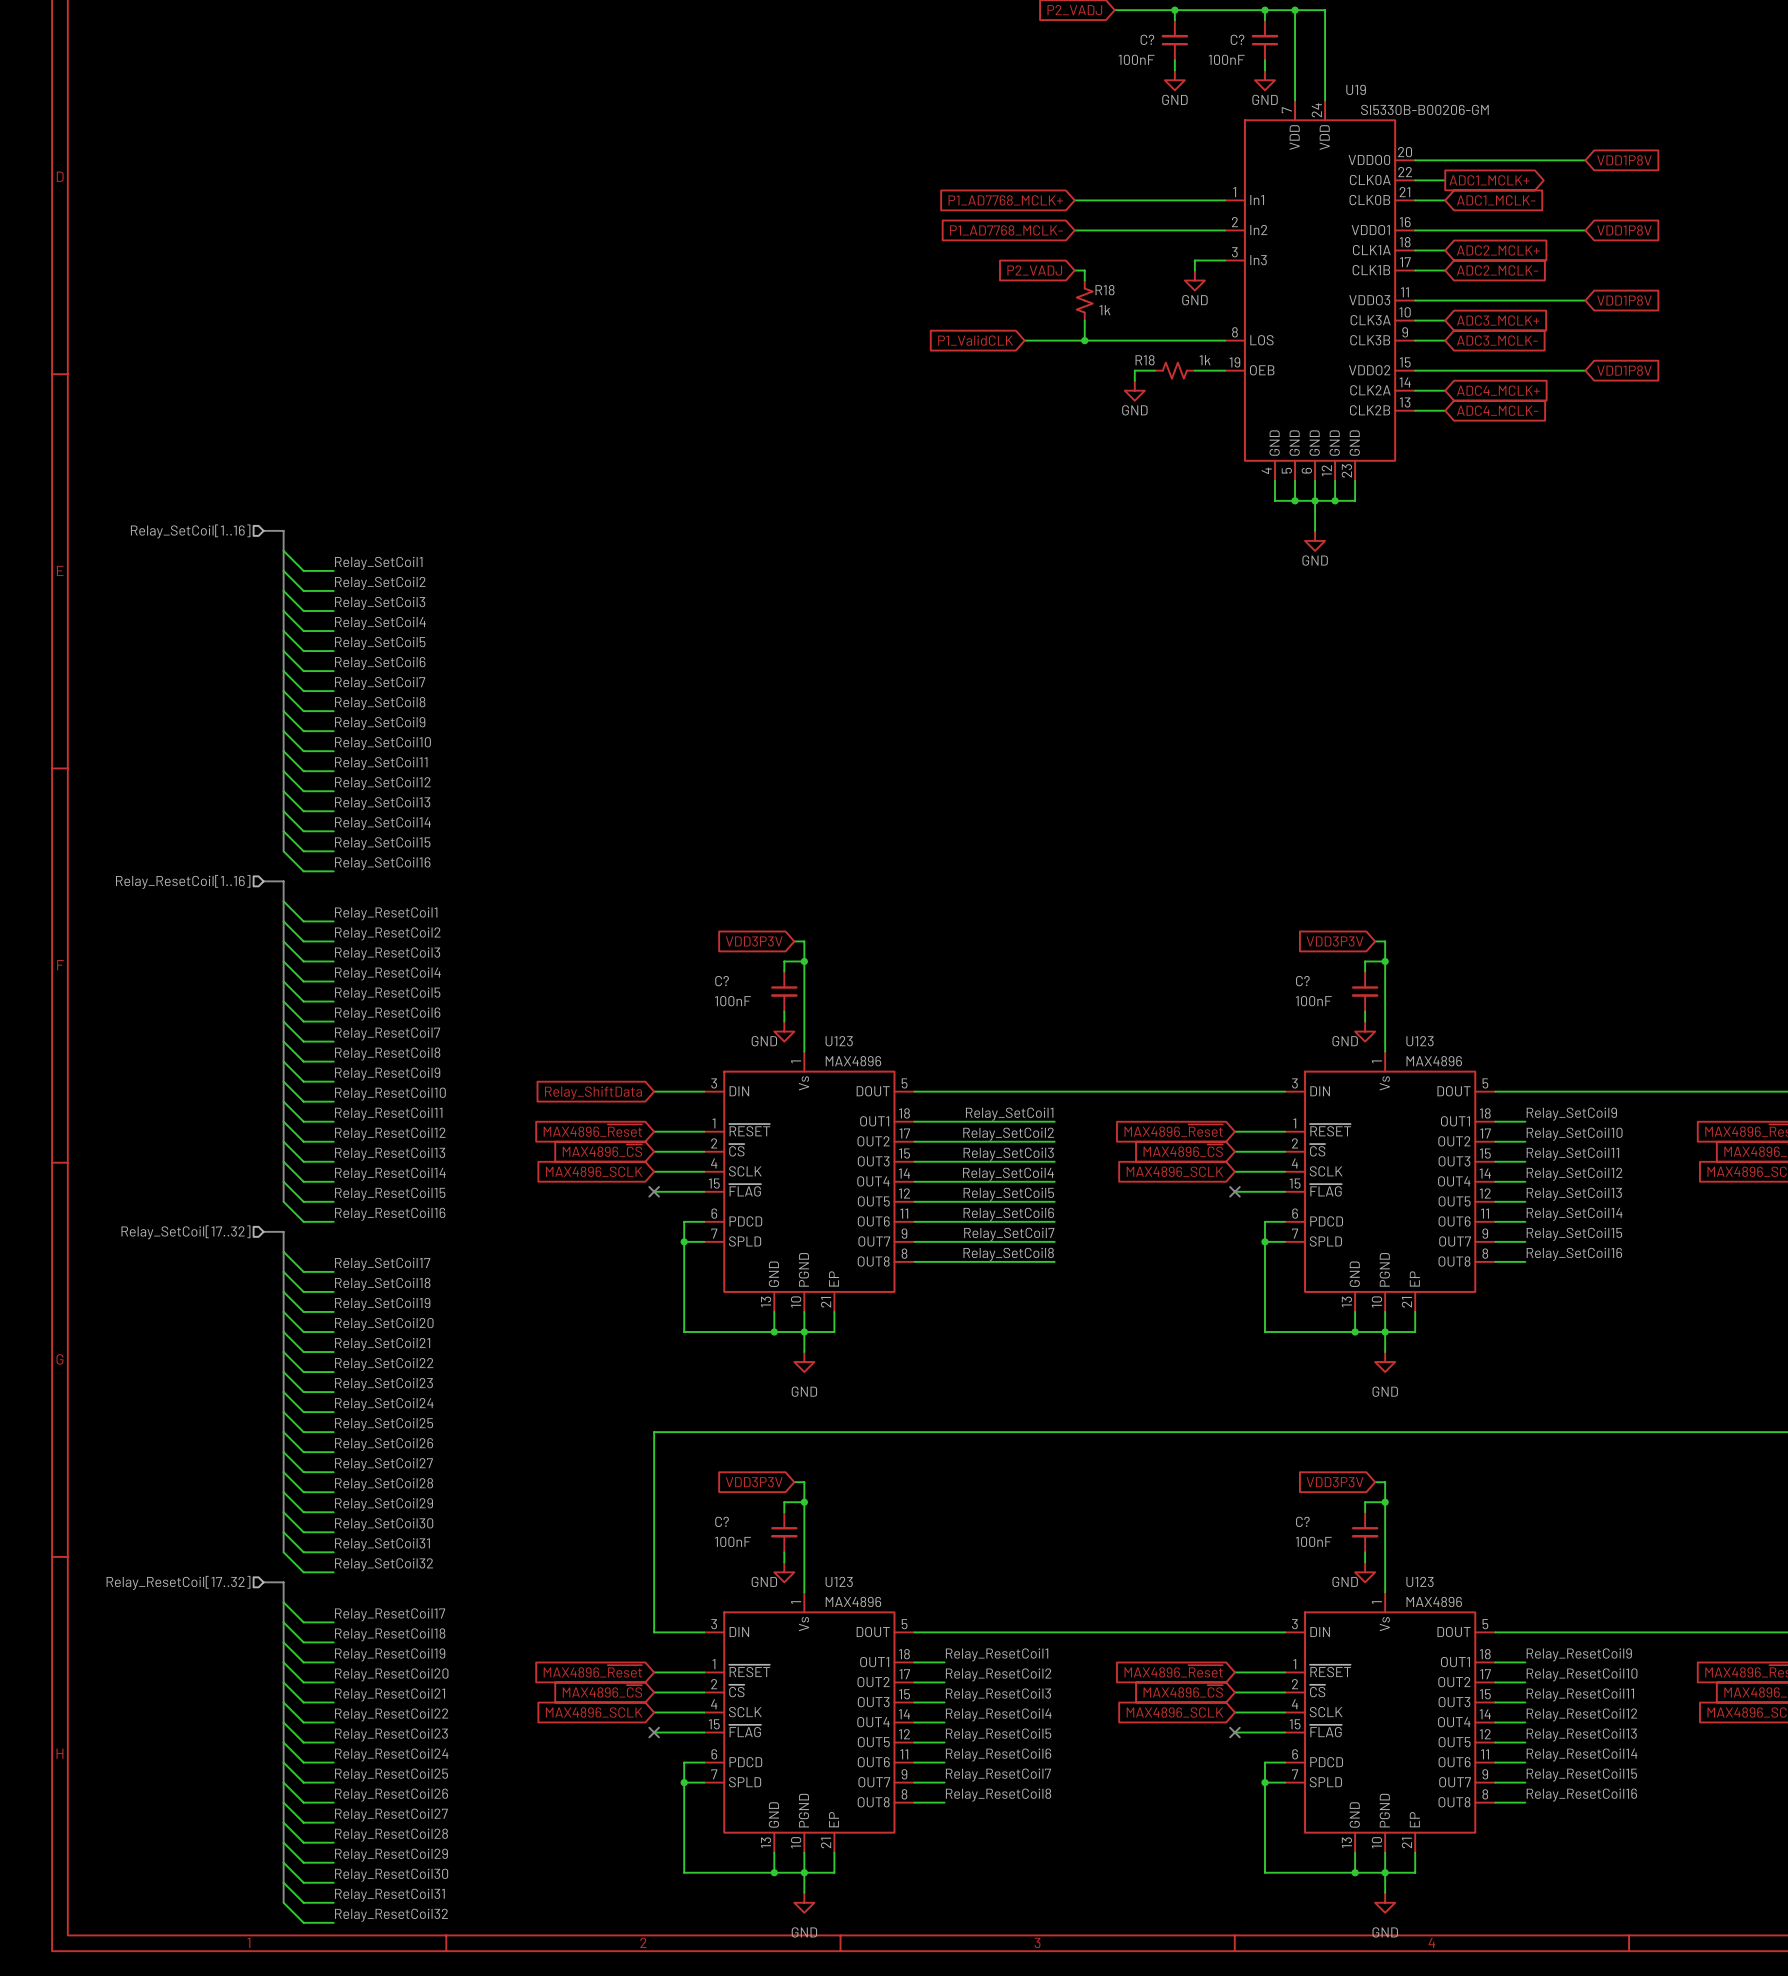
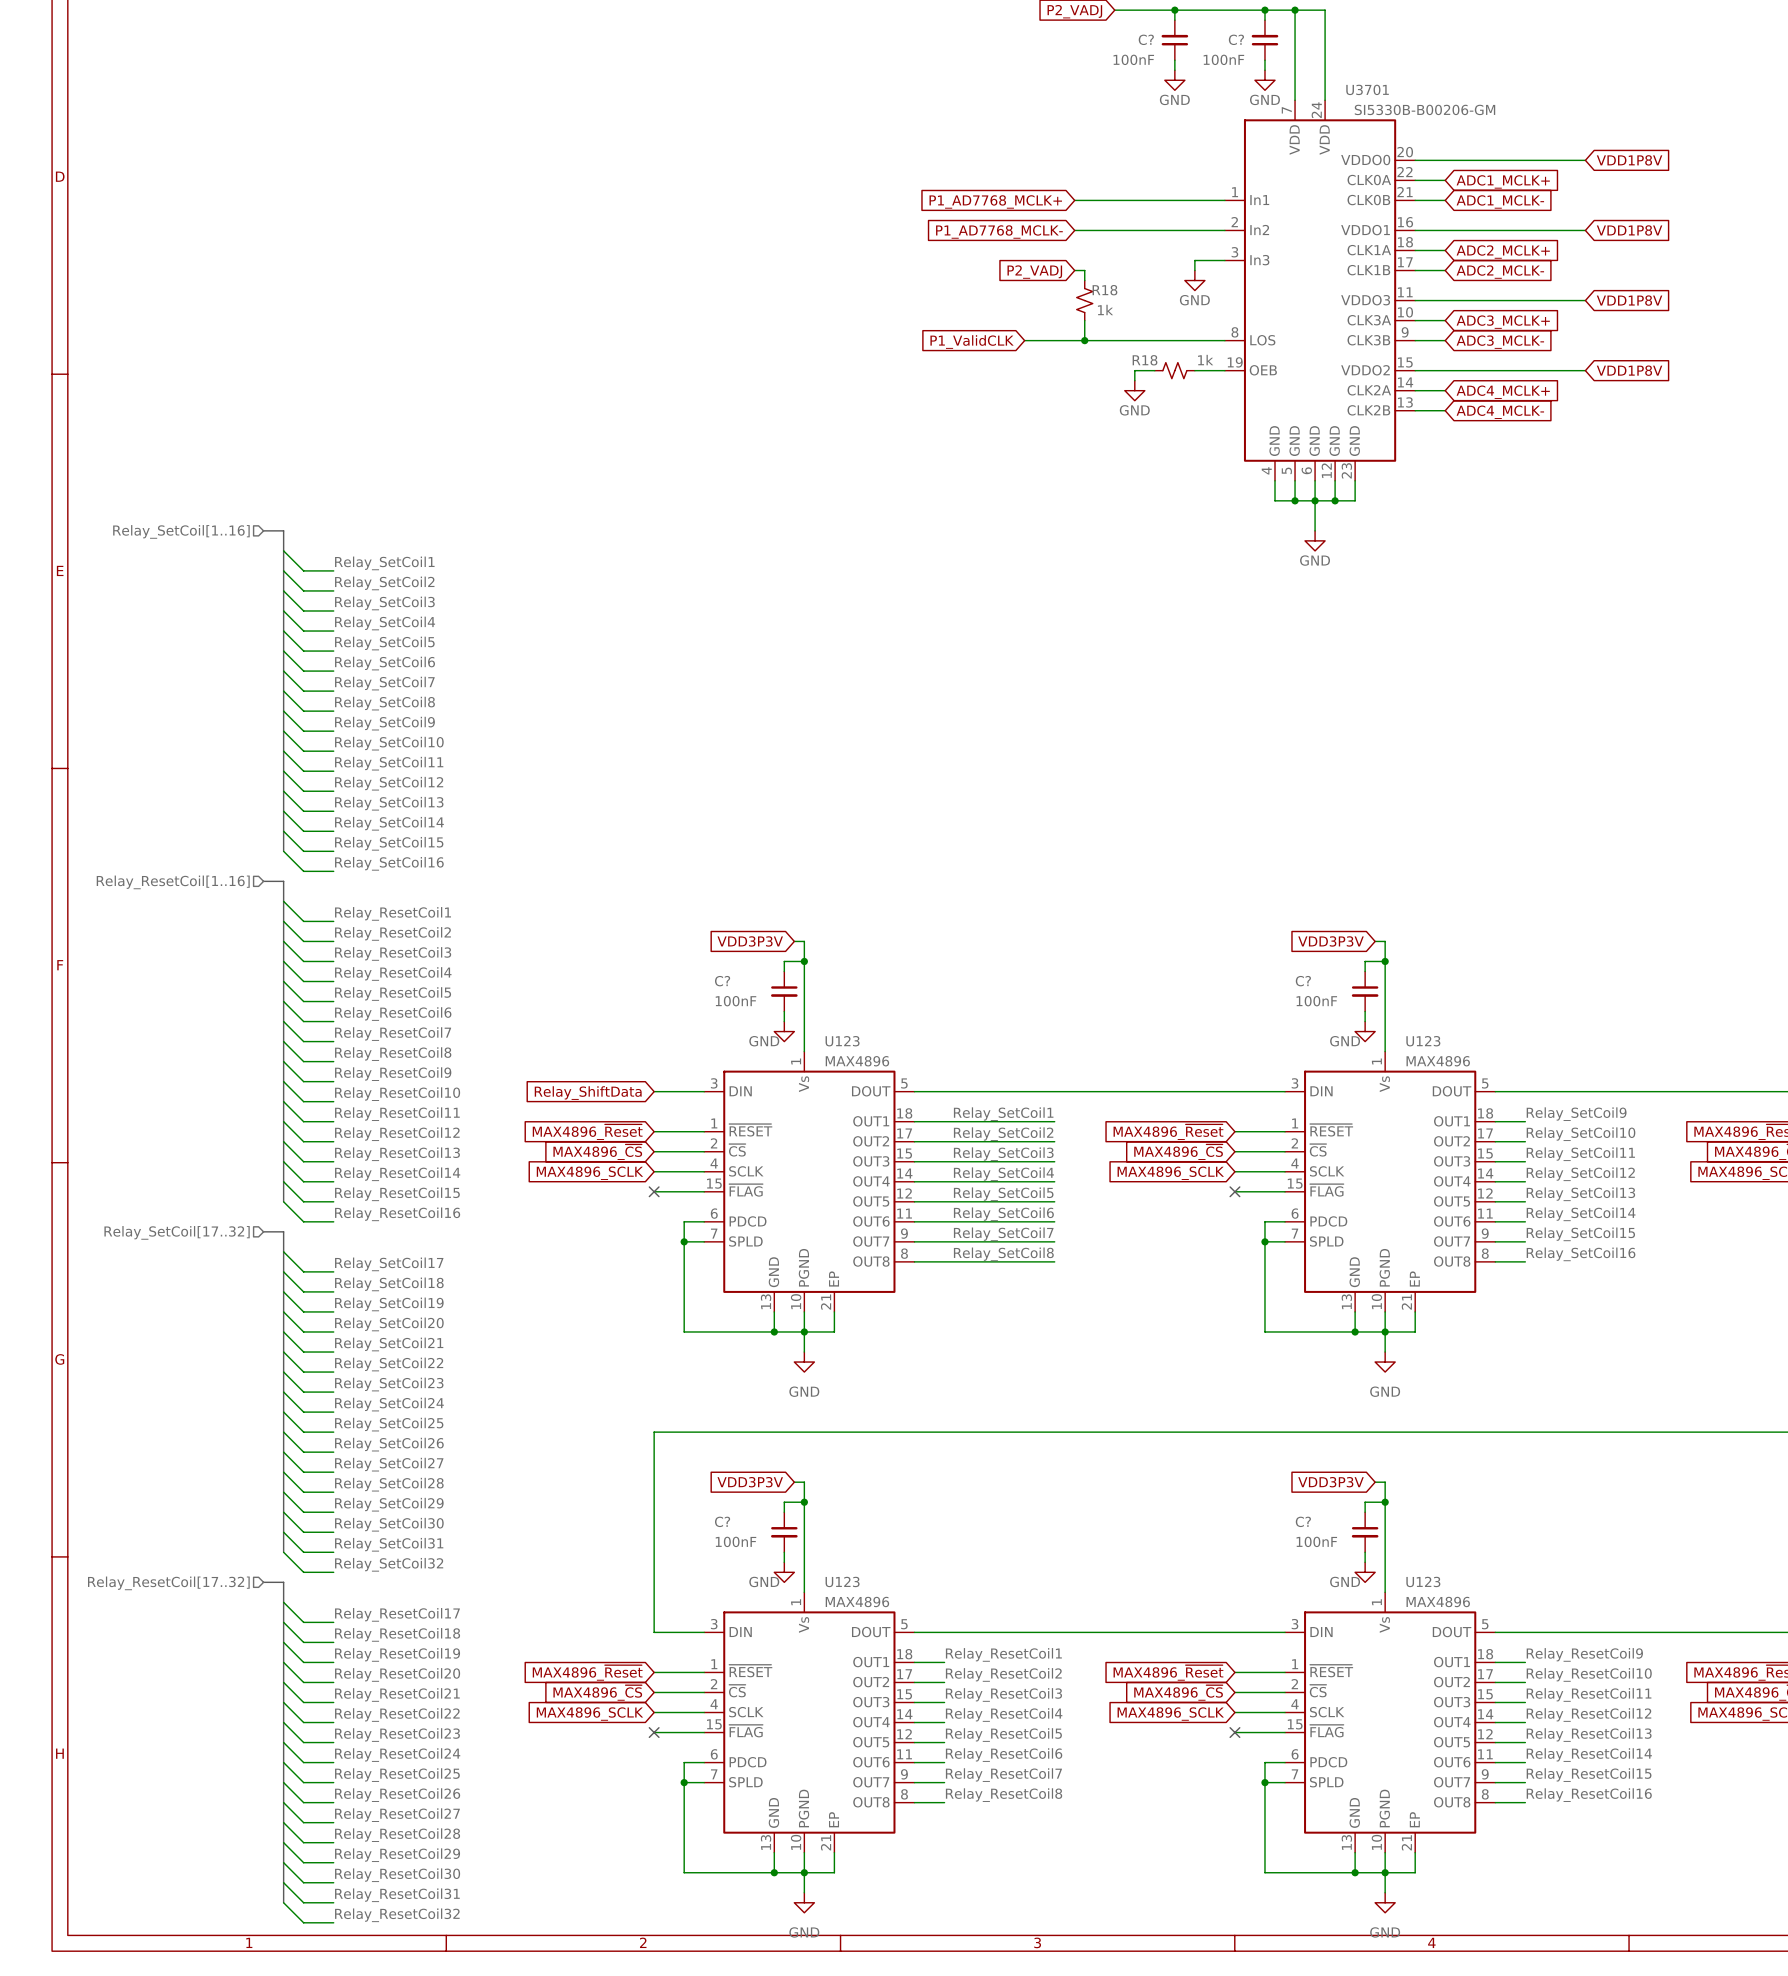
U19 name: U19 (1356, 89) -> U3701 (1367, 89)
global label shape: output (1489, 180) -> input (1503, 181)

